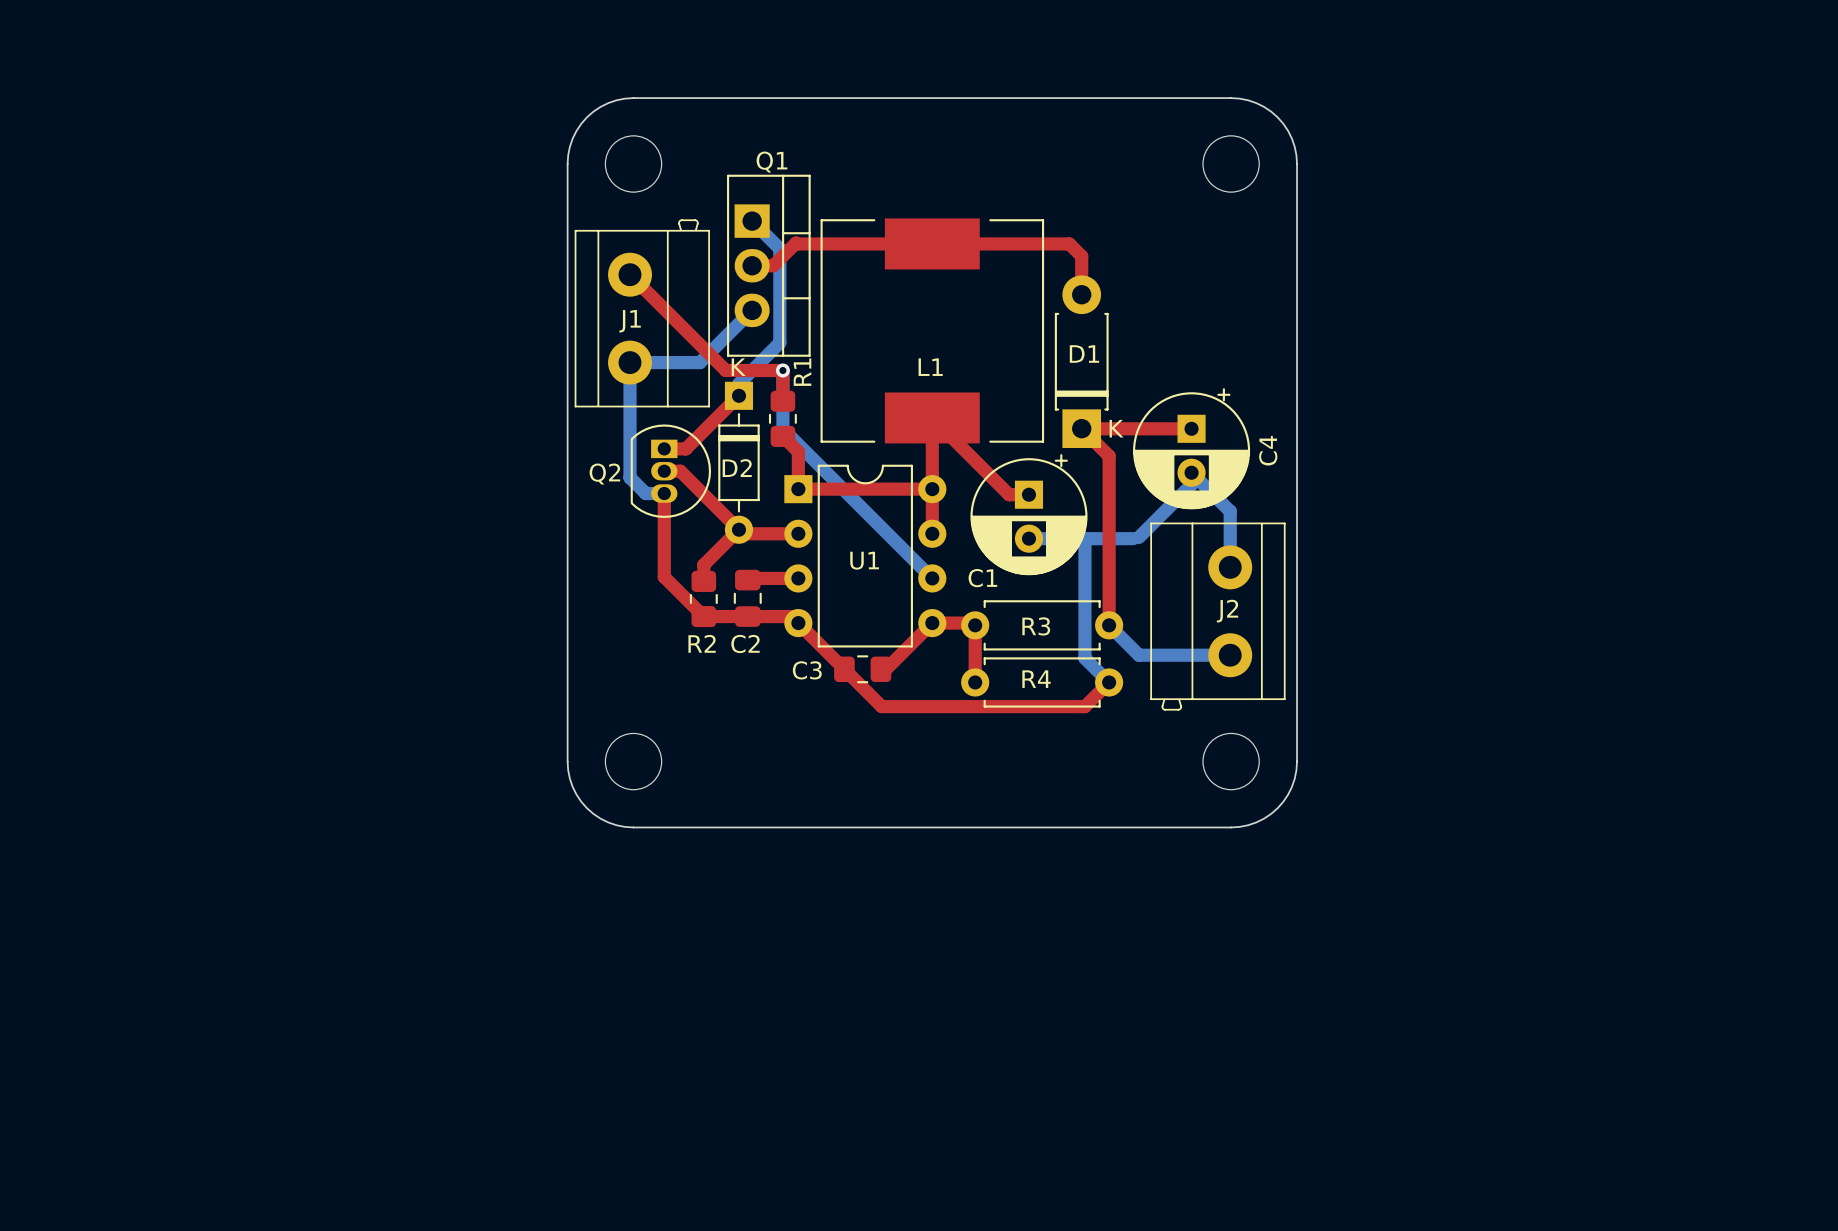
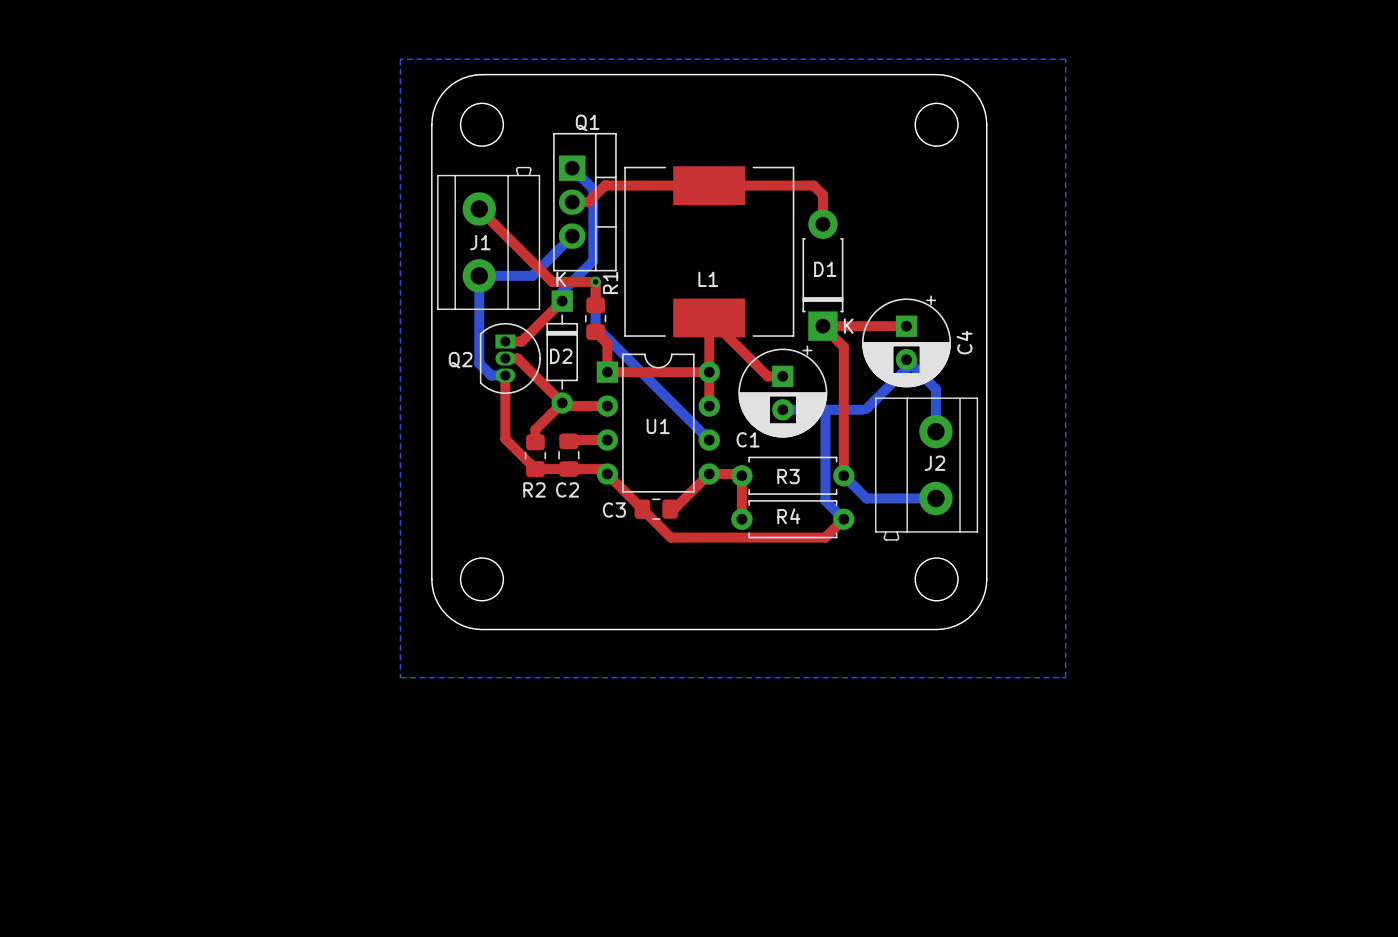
bottom zone outline: none -> (400, 59) (1065, 59) (1065, 677) (400, 677) (400, 59)

